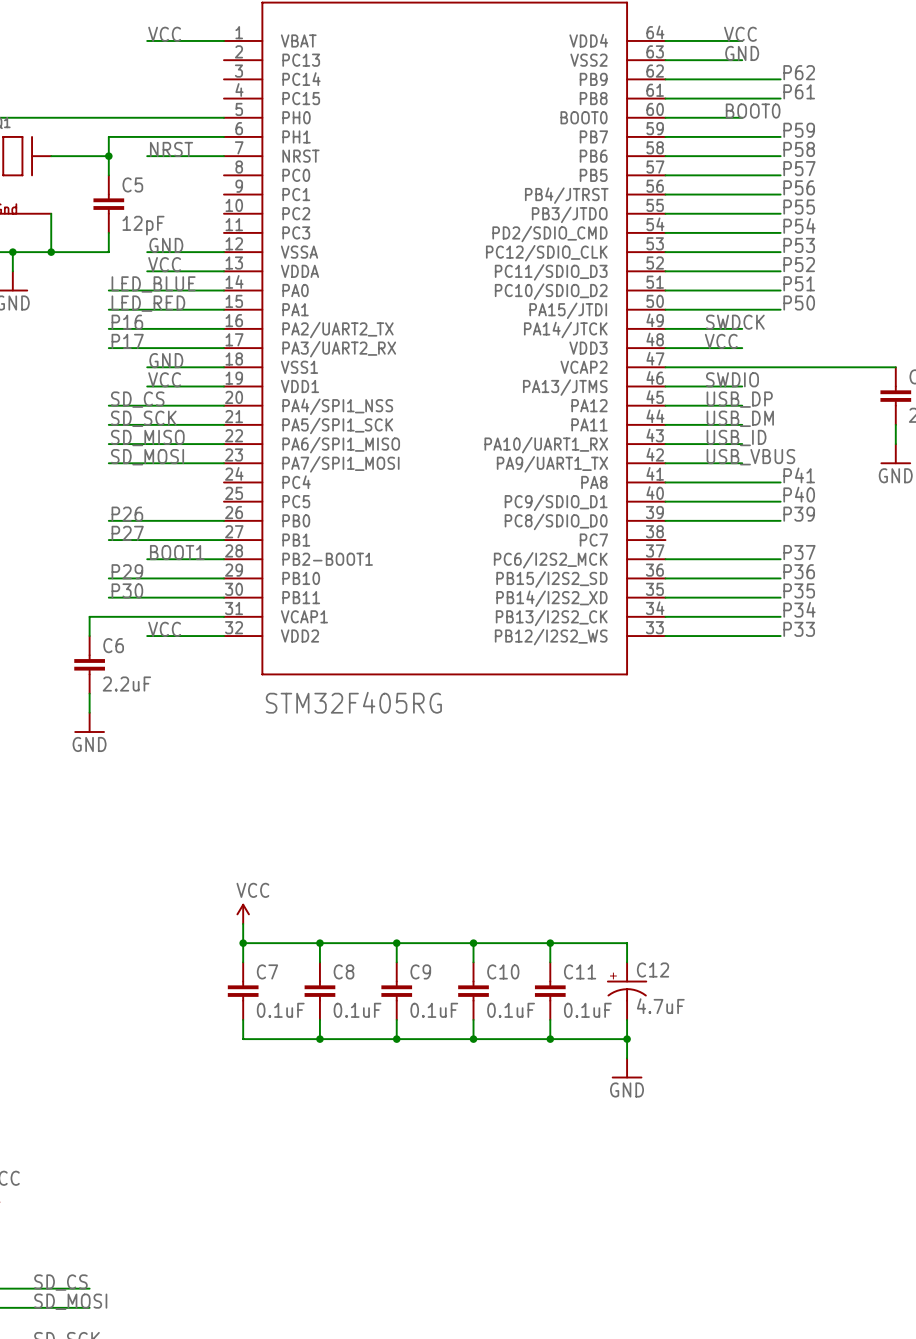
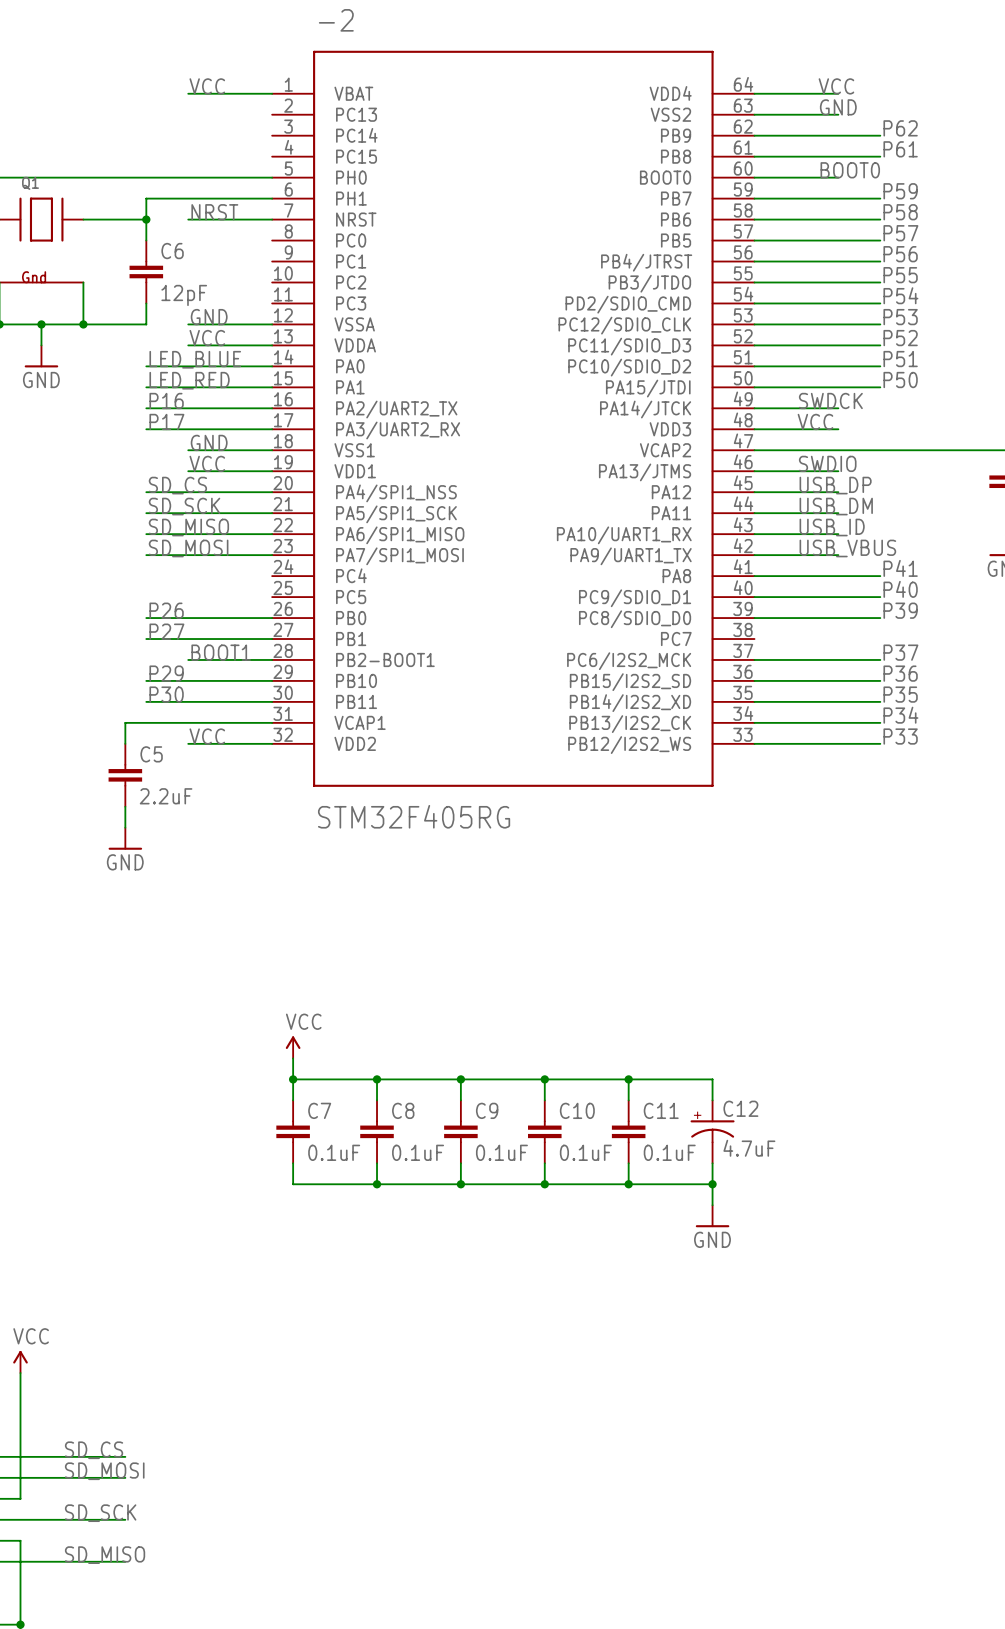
C5 name: C5 (132, 184) -> C6 (172, 251)
C6 name: C6 (113, 645) -> C5 (151, 754)

